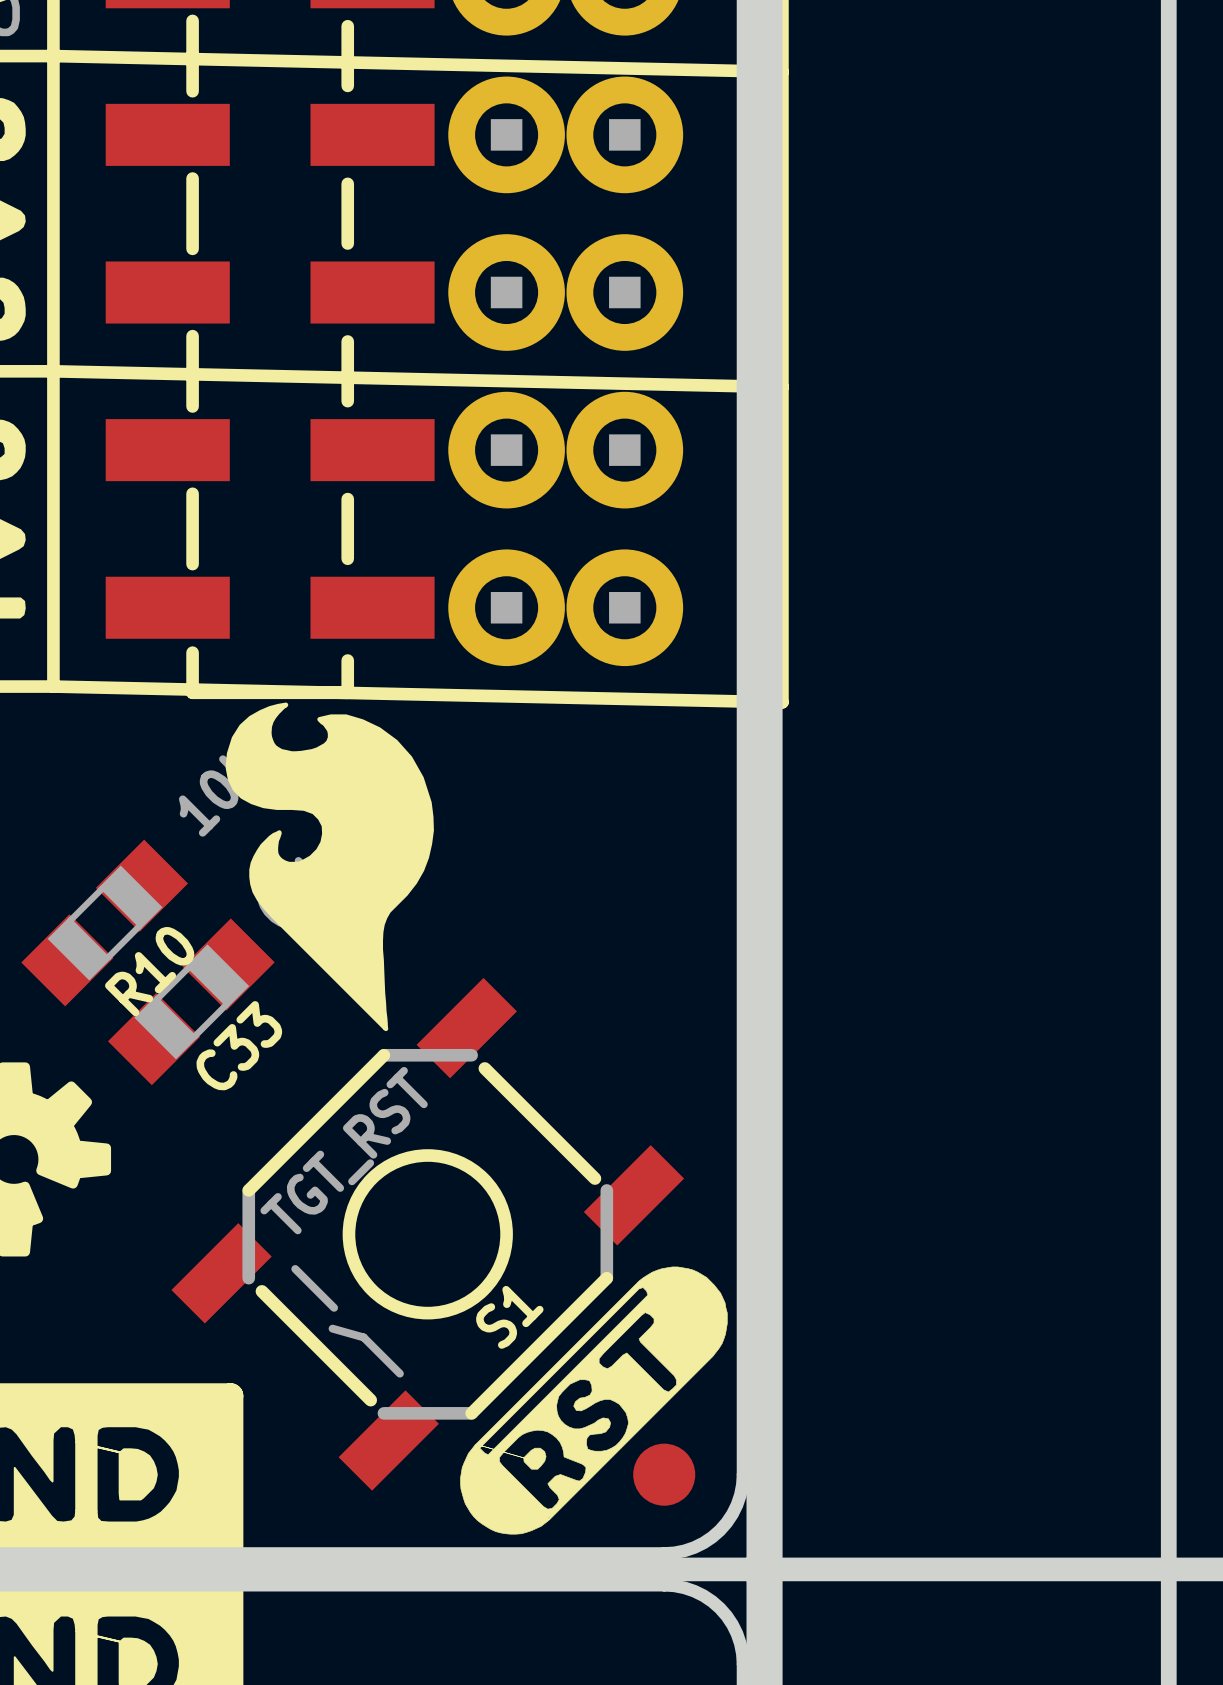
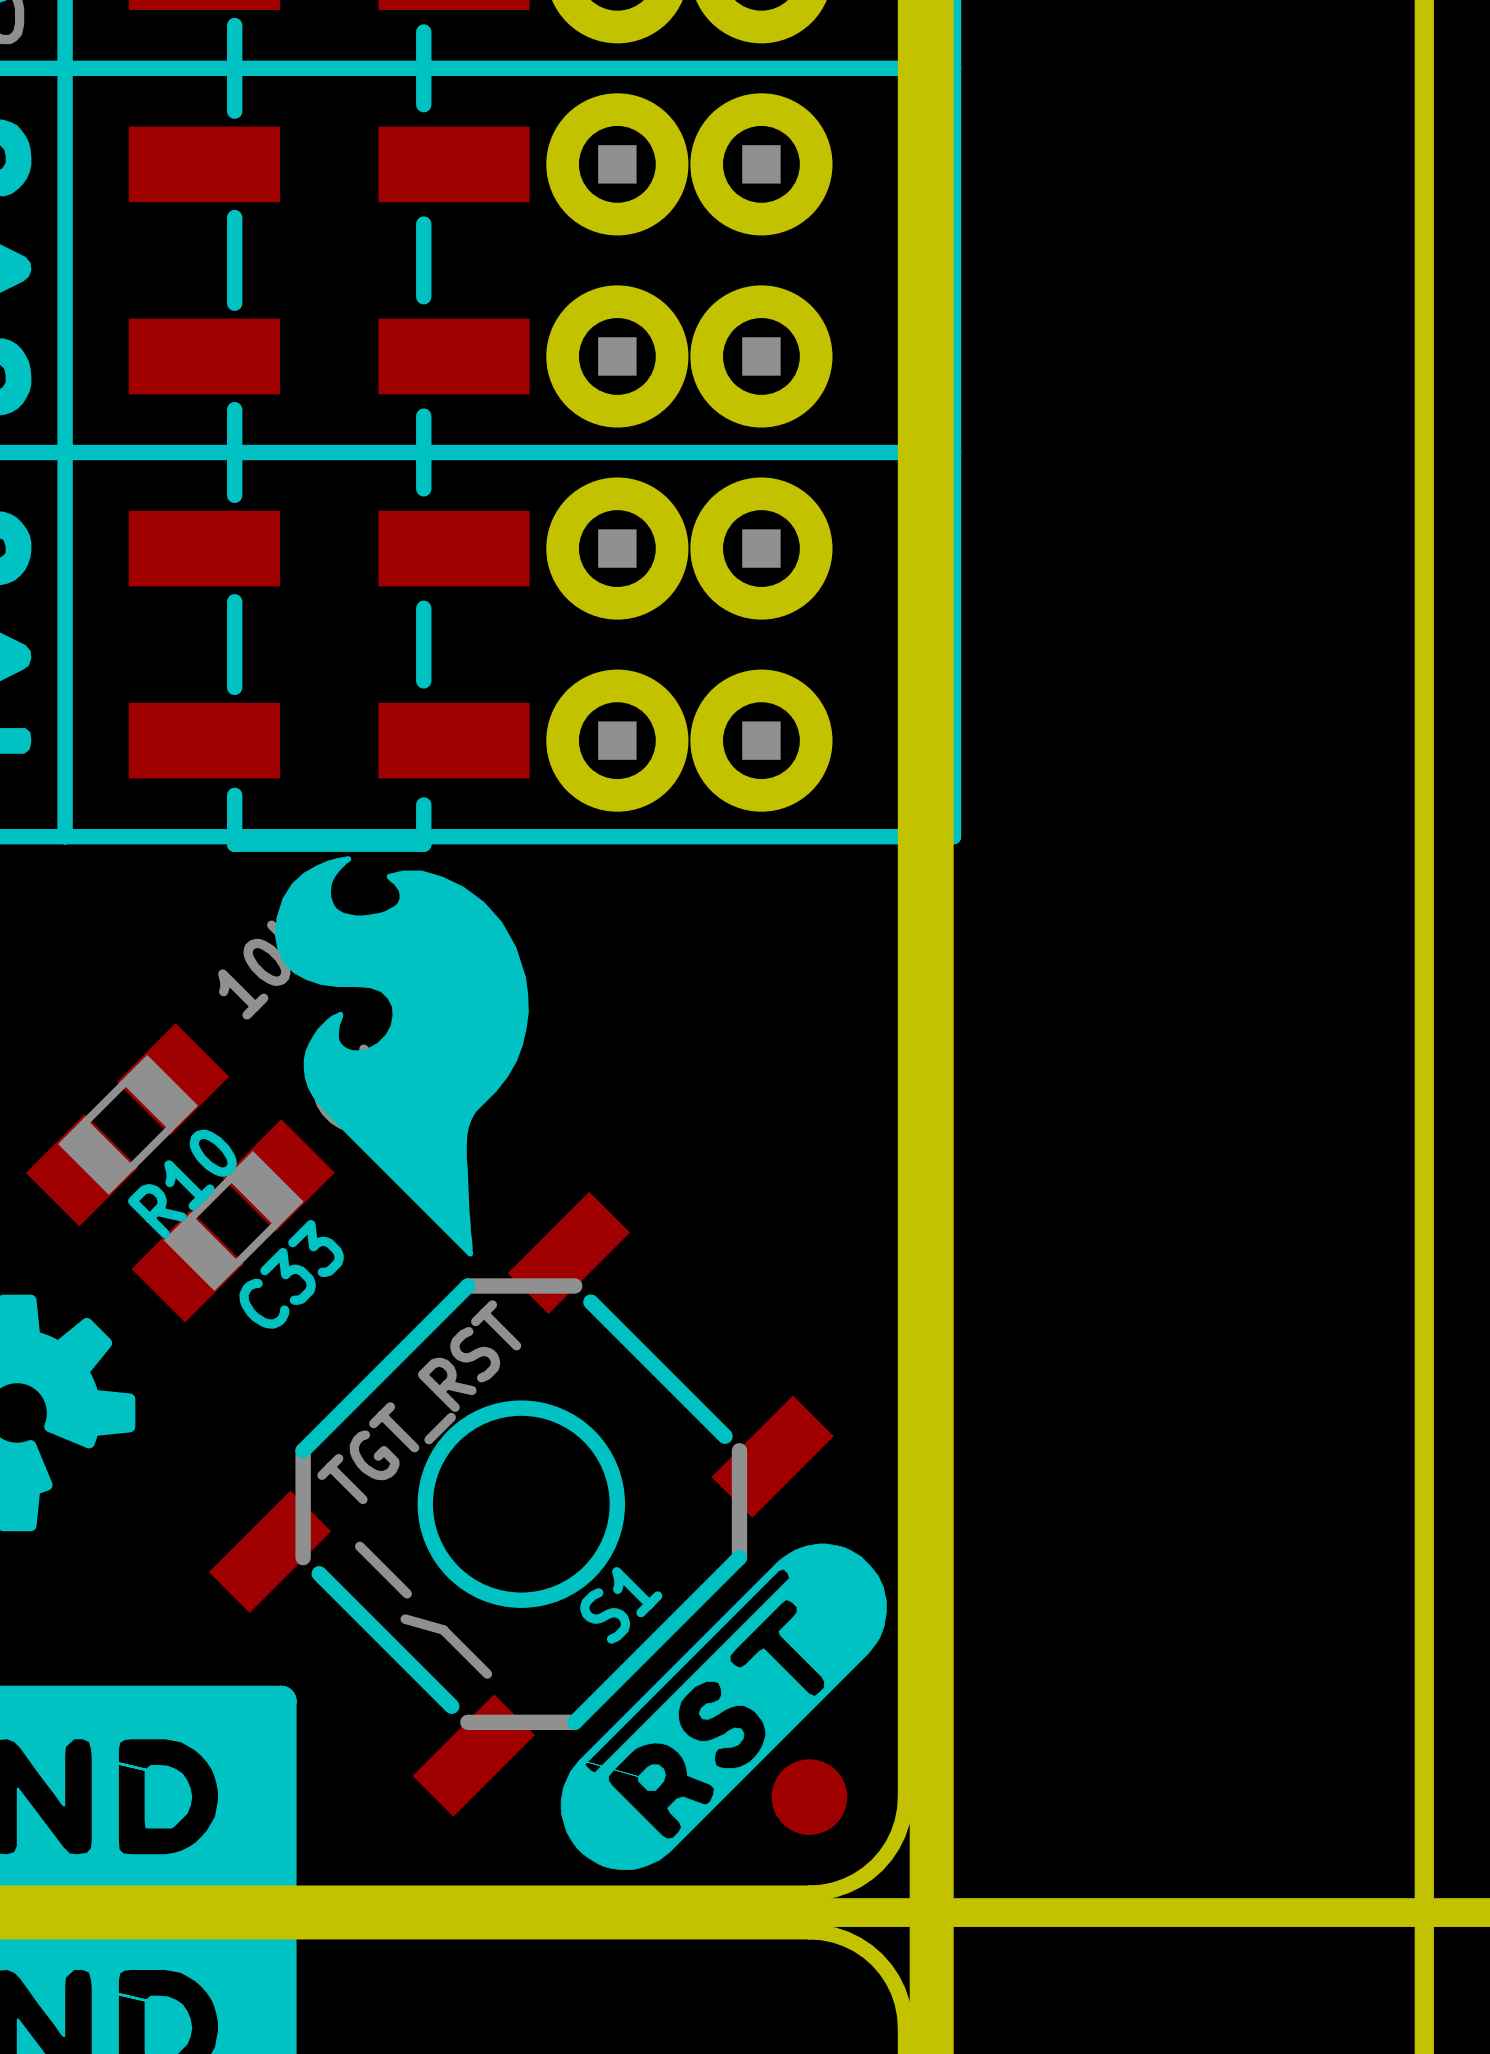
line: (53, 56) (782, 71) -> (65, 68) (953, 68)
line: (53, 371) (782, 387) -> (65, 452) (953, 452)
line: (53, 686) (782, 702) (782, 686) -> (65, 836) (953, 836)

